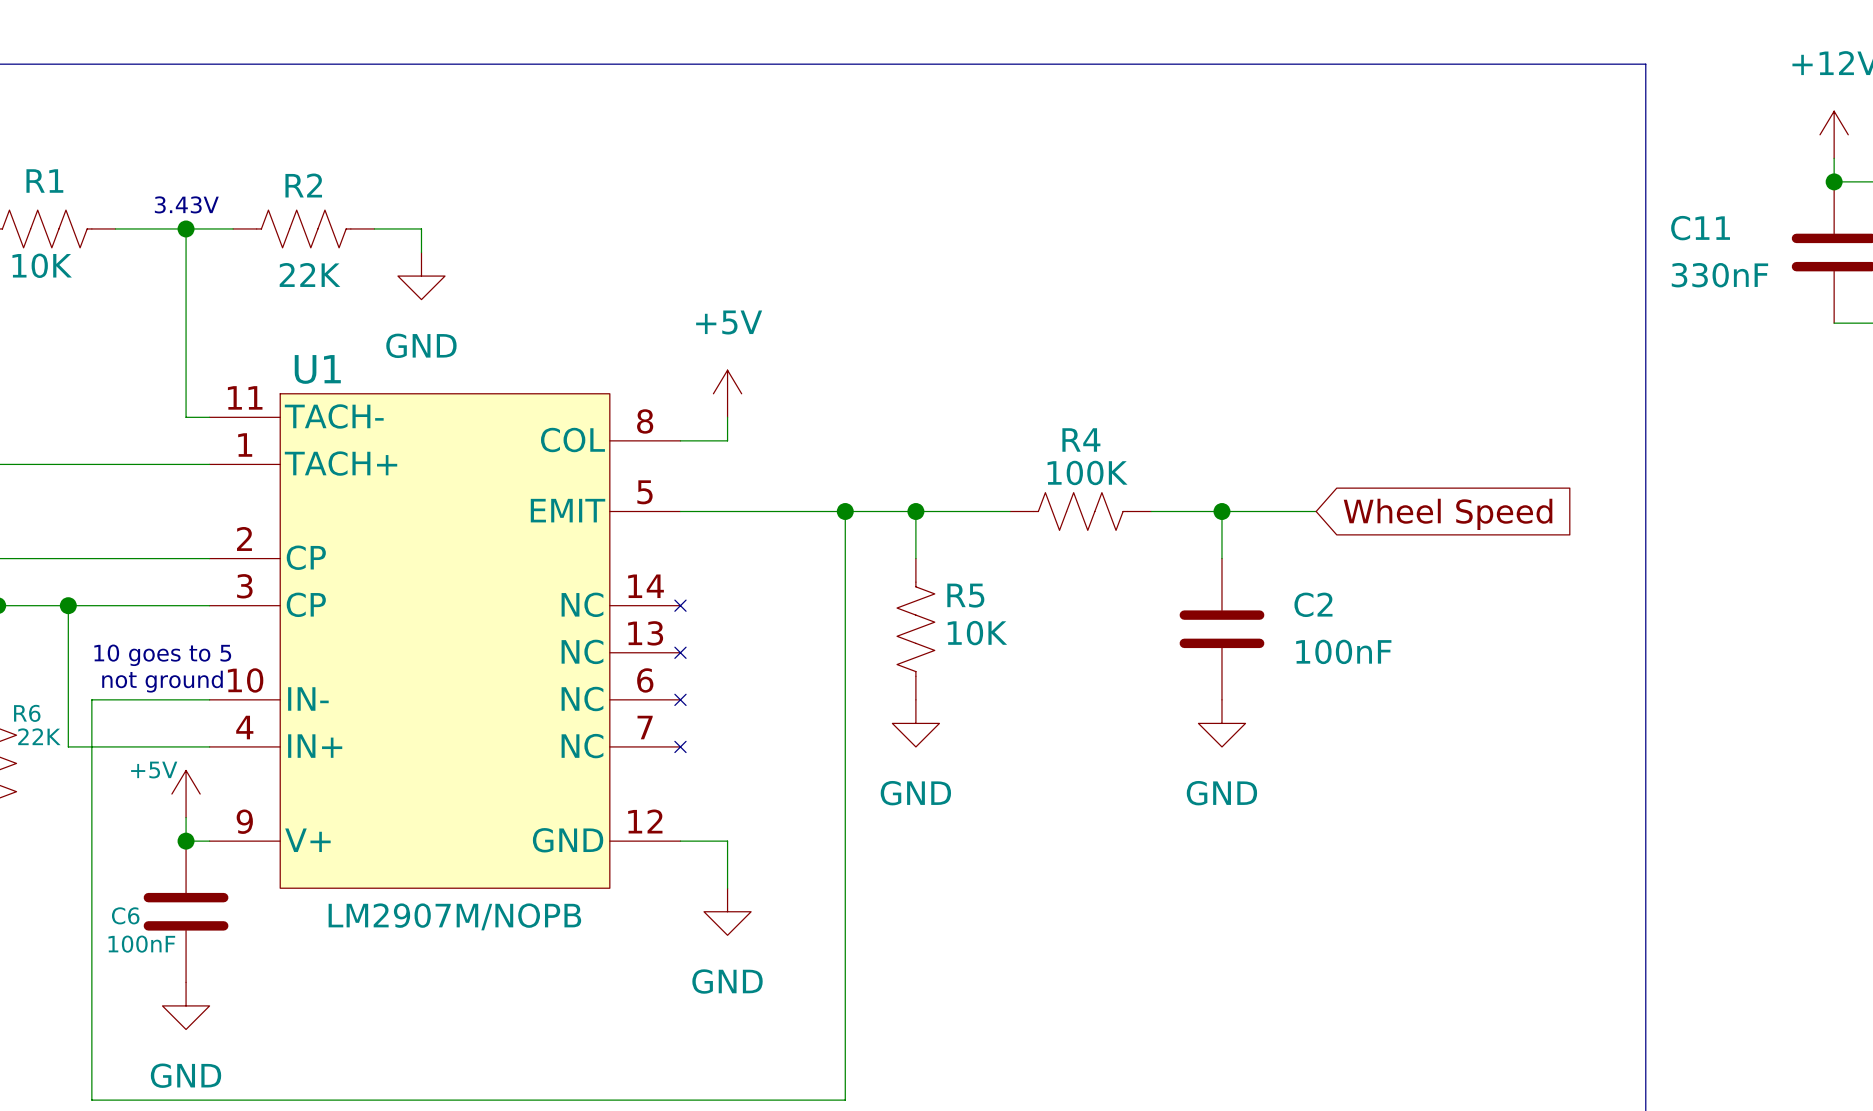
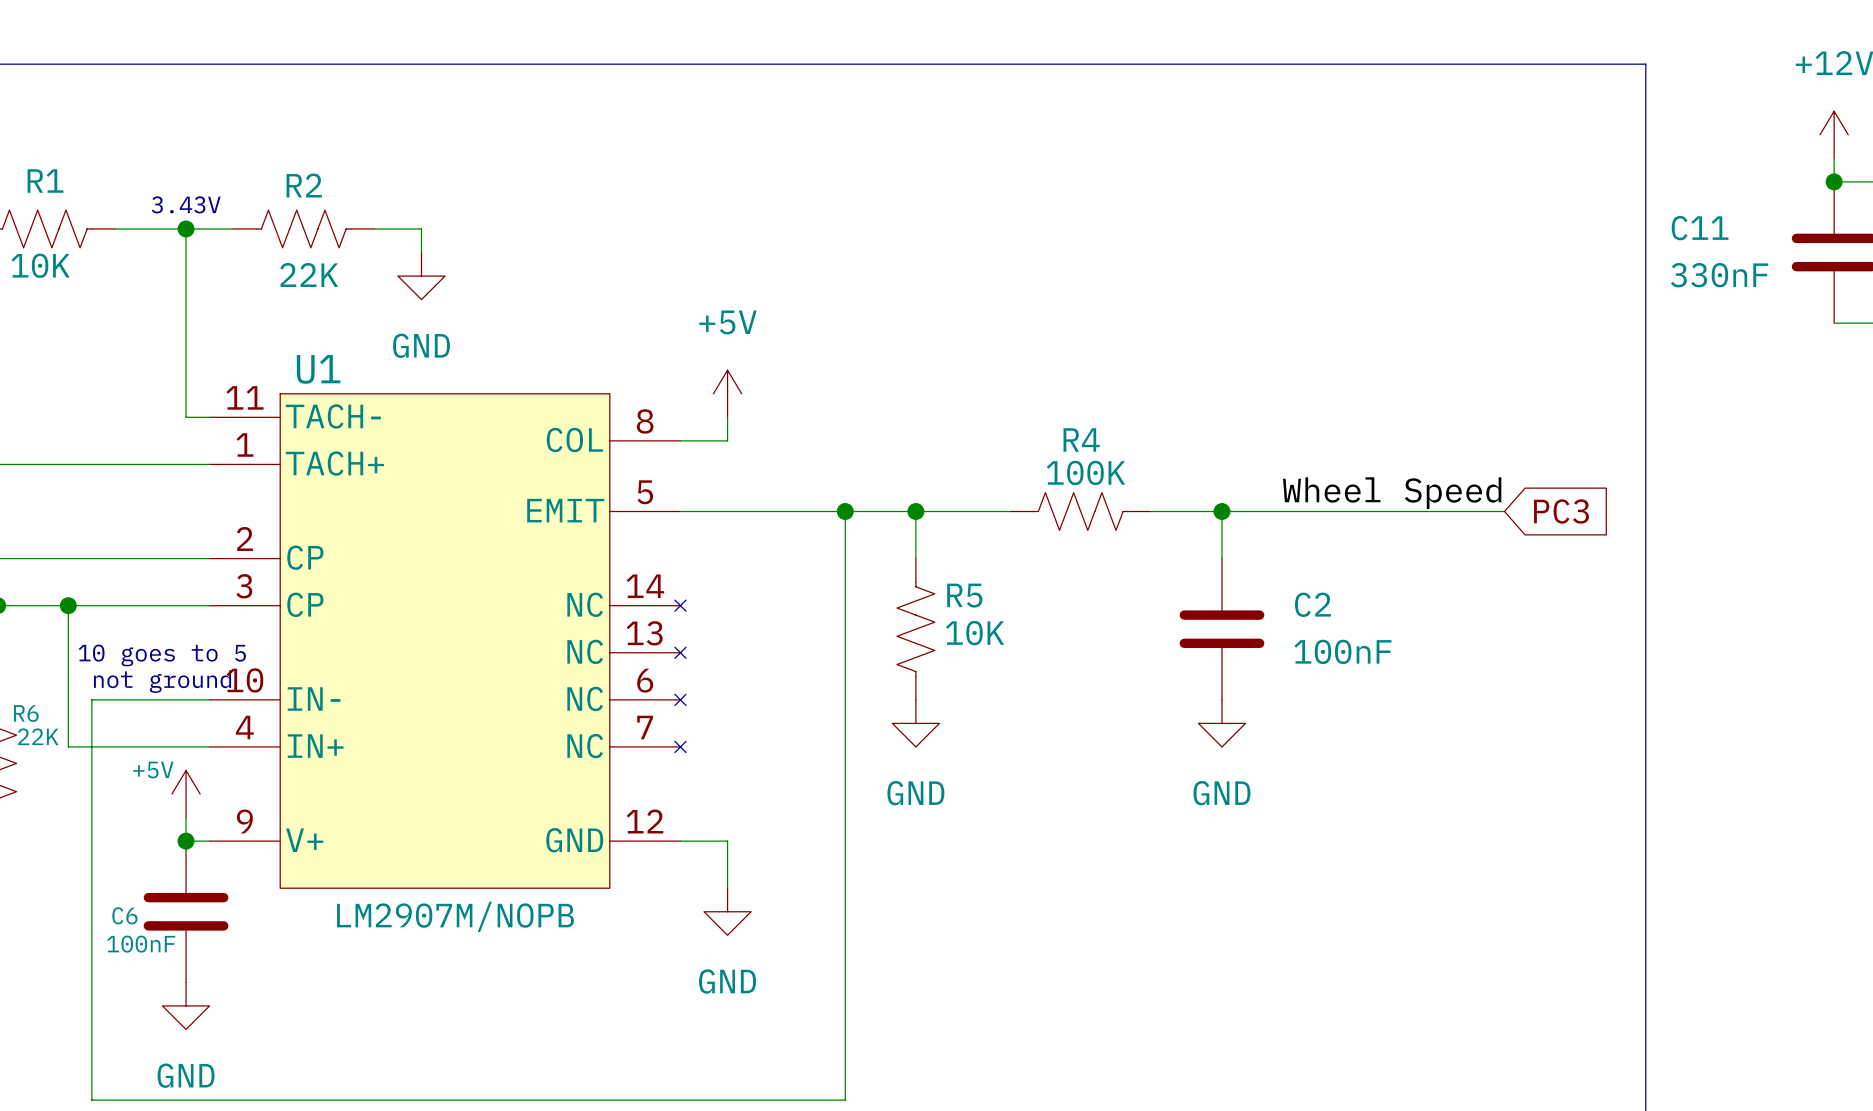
label: none -> Wheel Speed (1392, 493)
wire: none -> (1316, 511) (1504, 511)
global label: none -> PC3 (1561, 511)
global label: Wheel Speed (1448, 514) -> none

